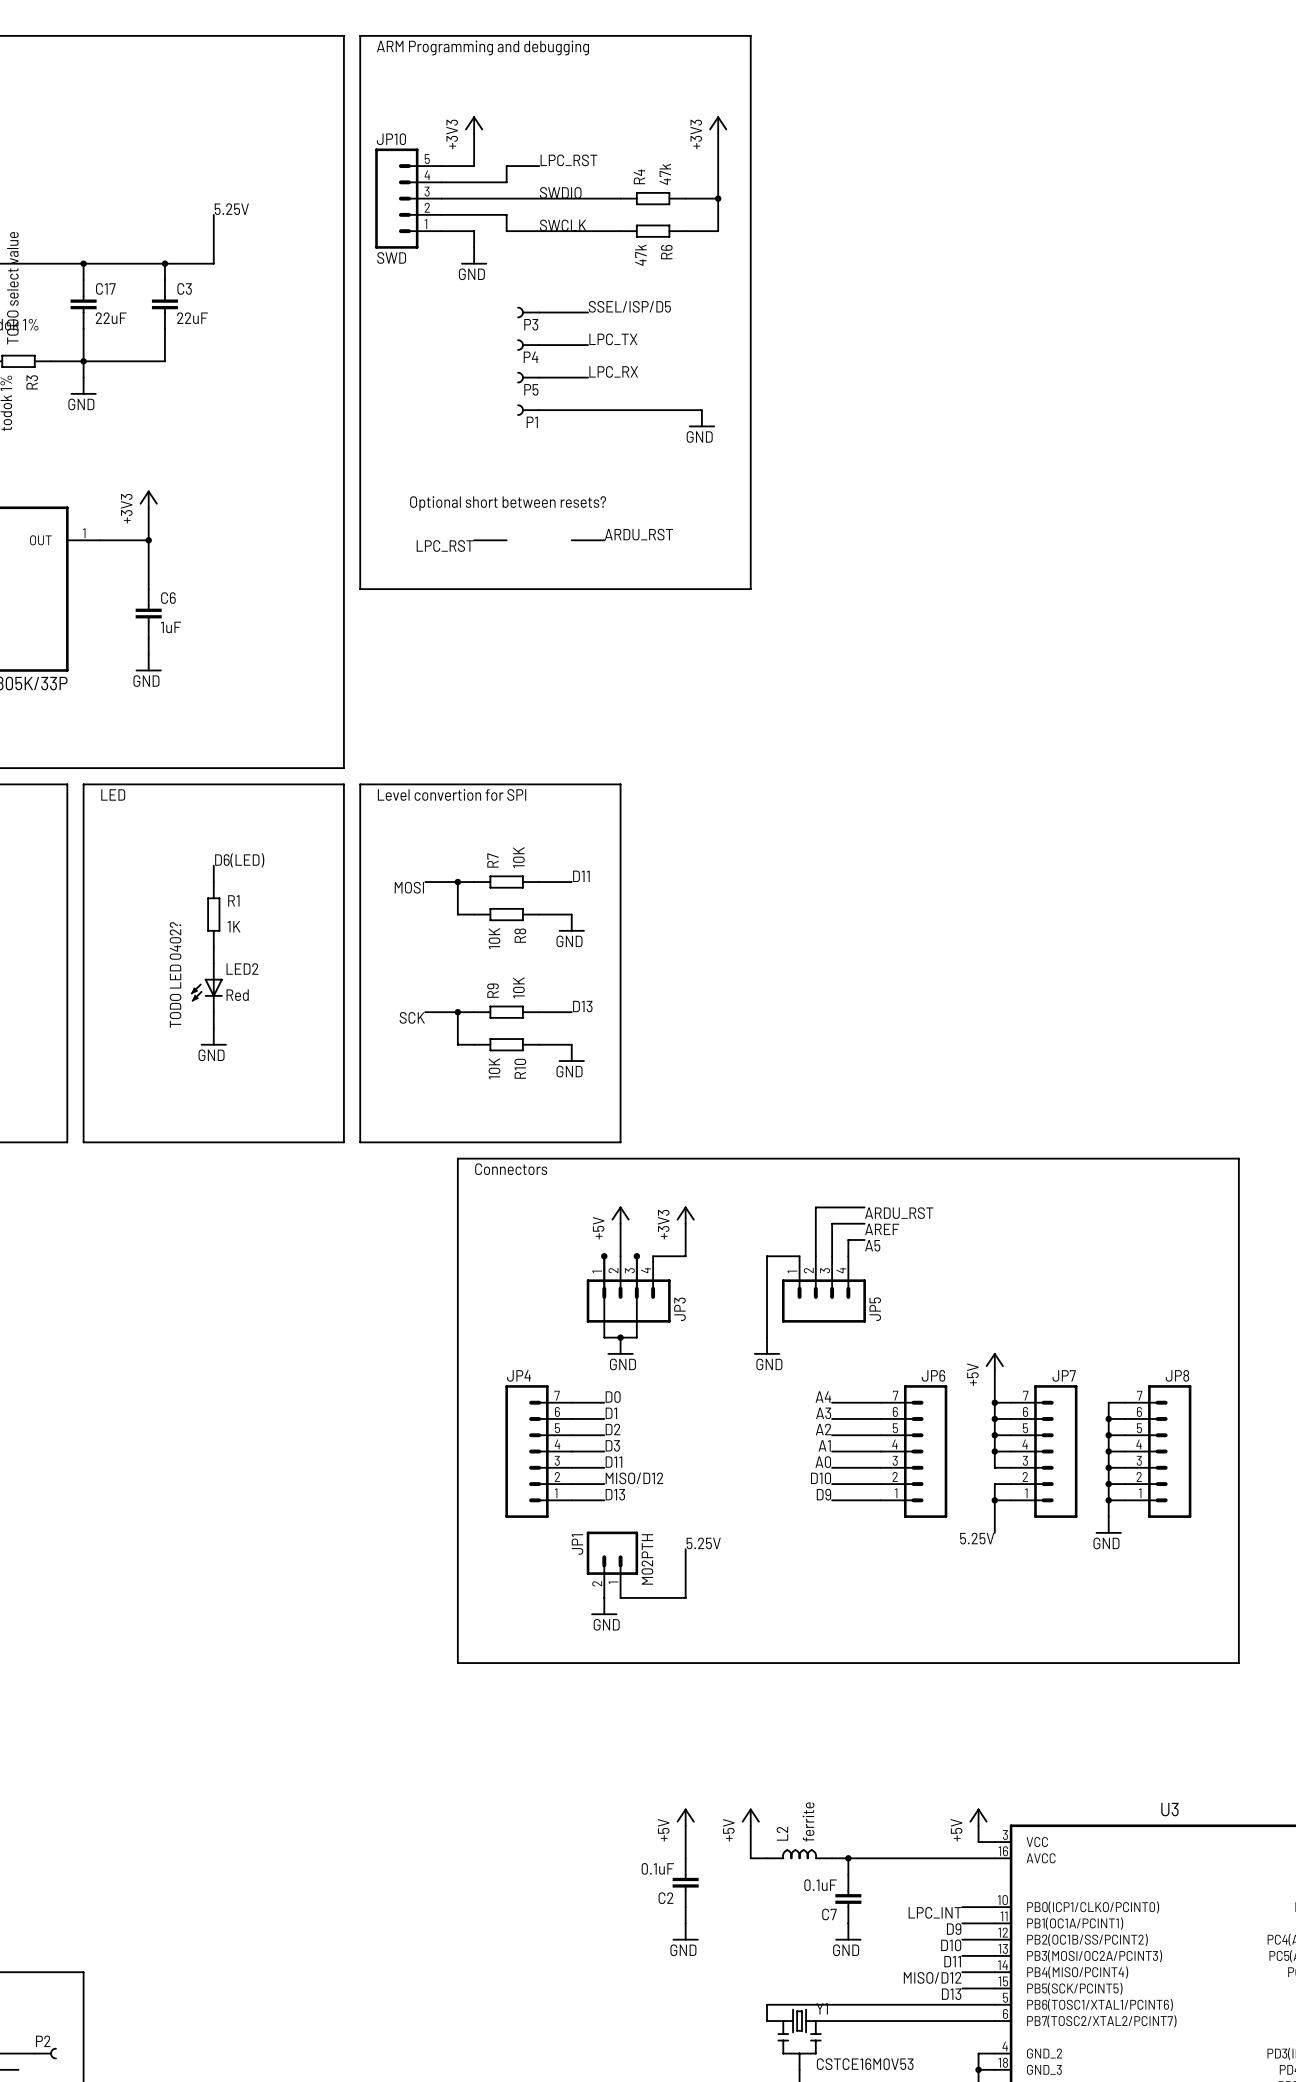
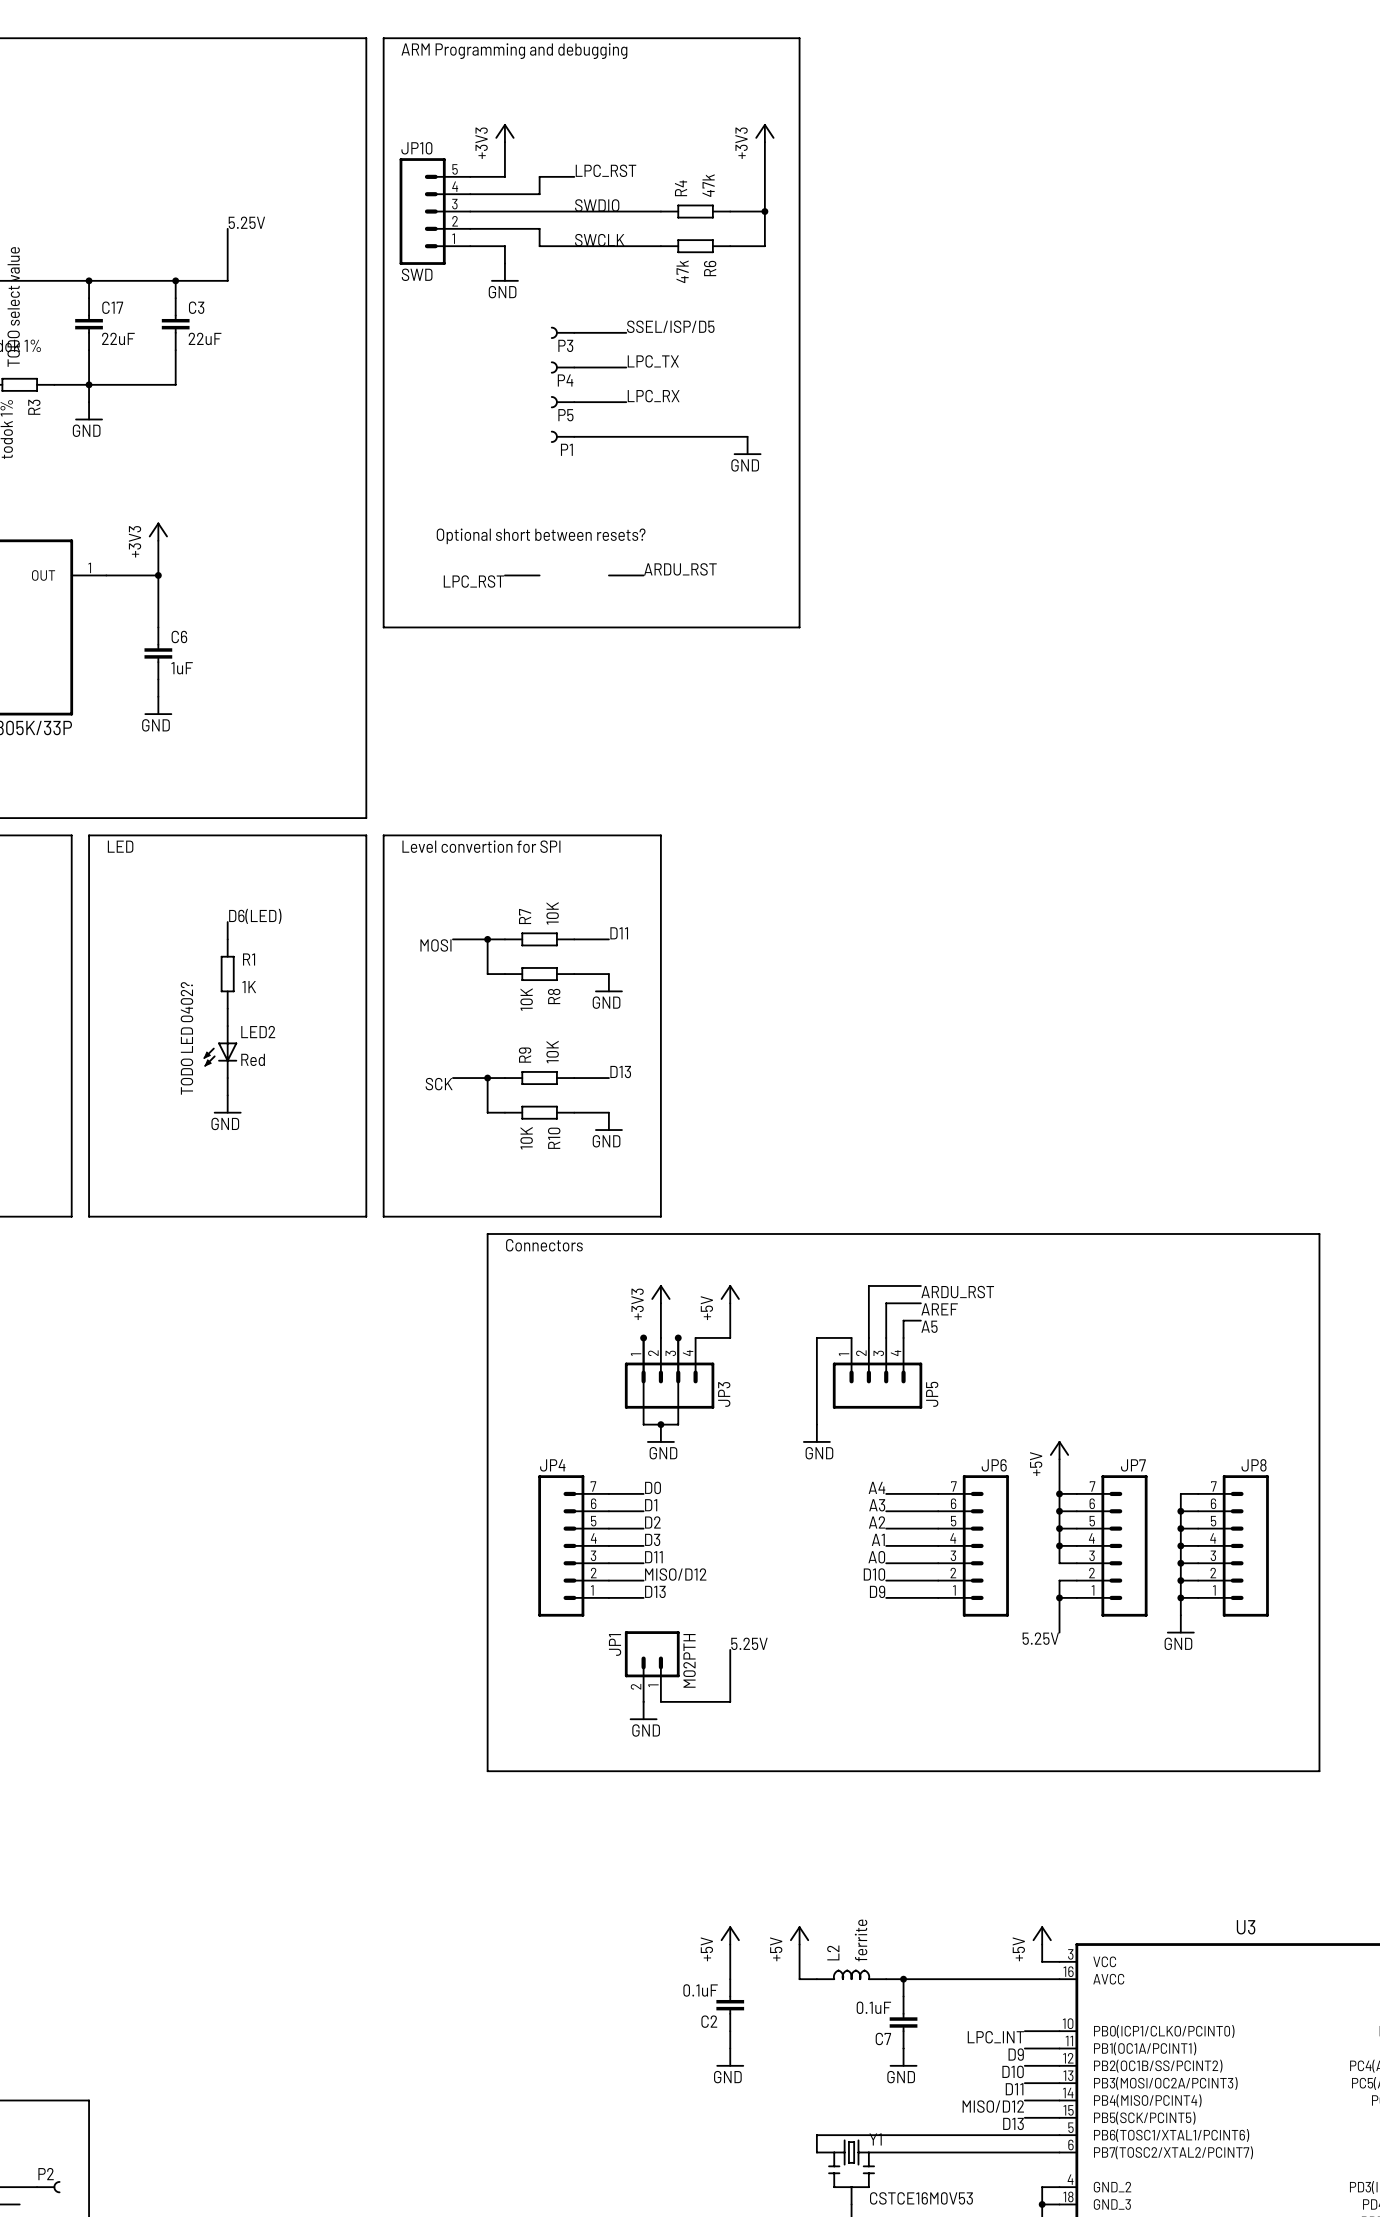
power symbol: +5V (620, 1215) -> +3V3 (660, 1294)
power symbol: +3V3 (685, 1215) -> +5V (730, 1294)

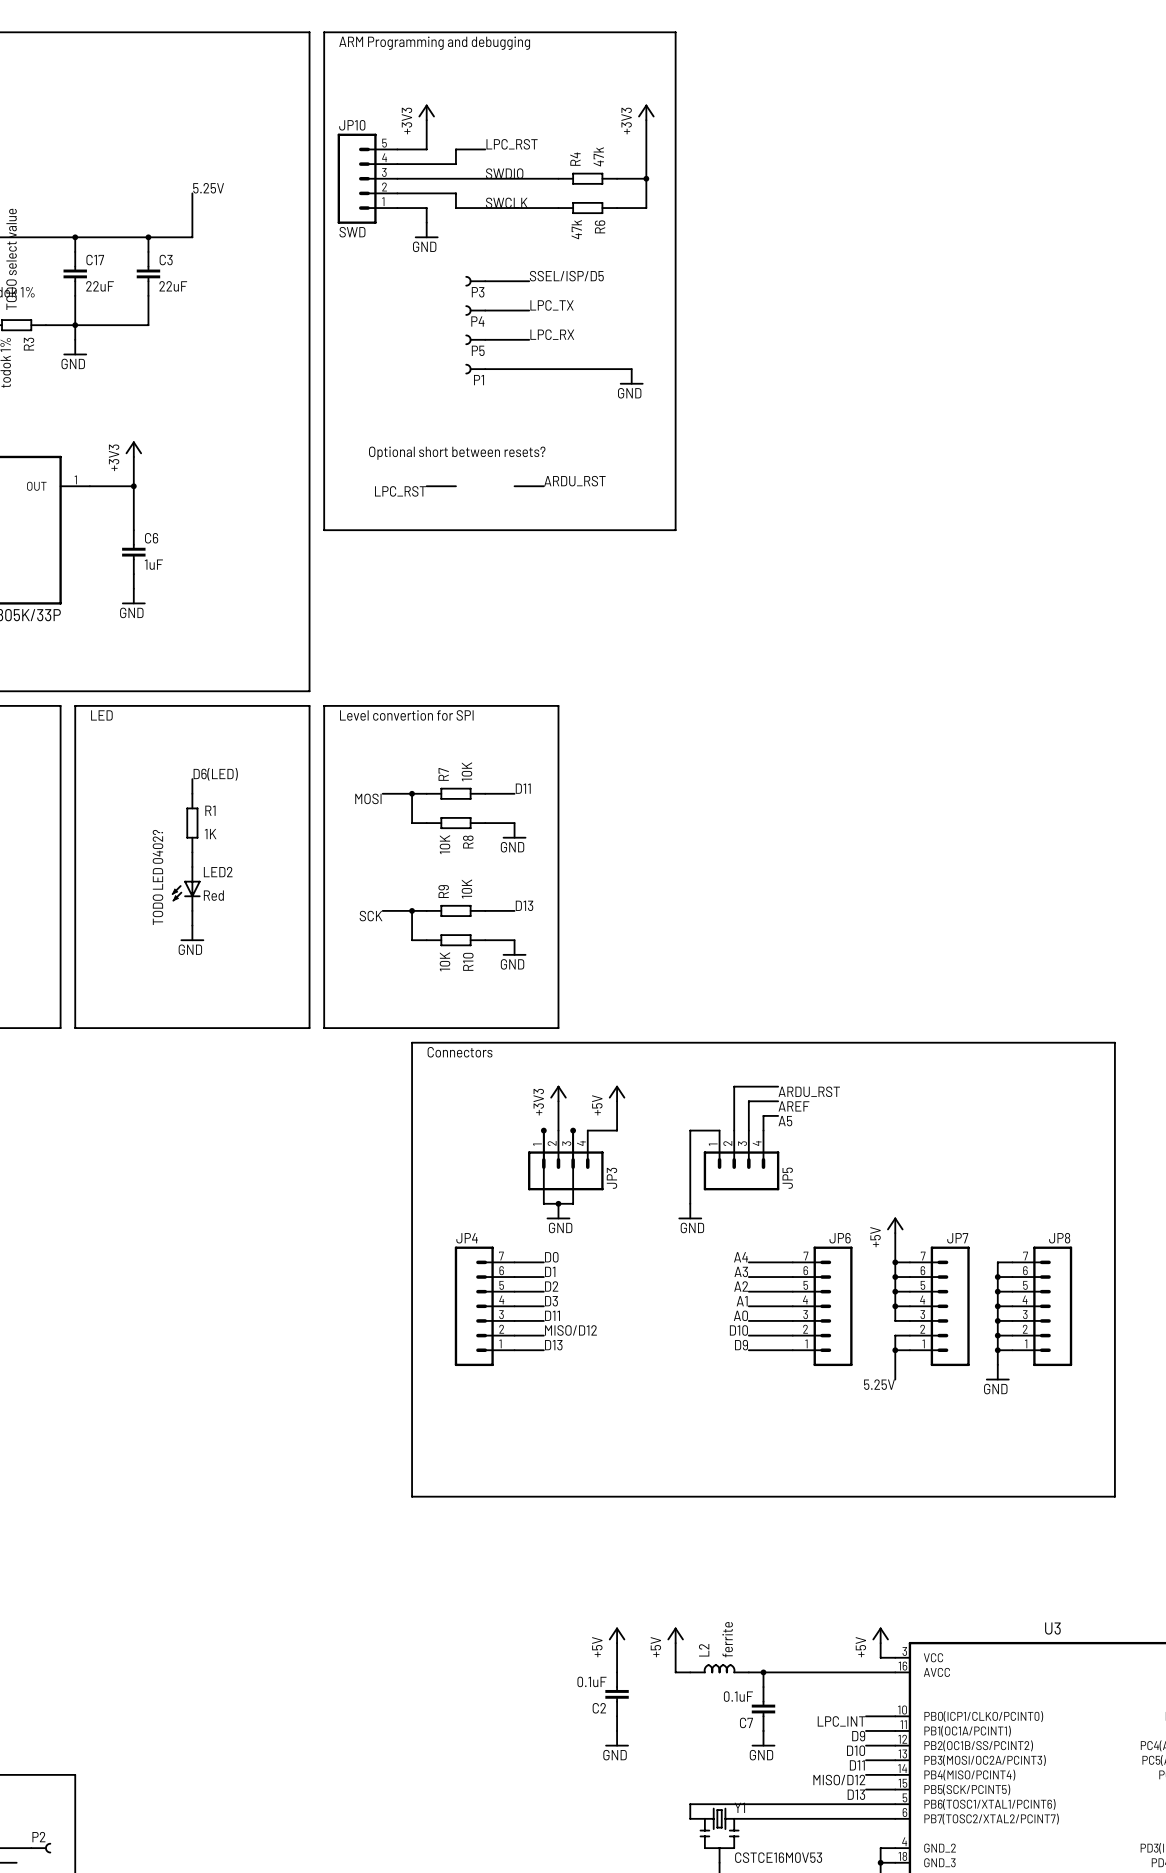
label: 5.25V (749, 1643) -> none
wire: (730, 1649) (730, 1701) (660, 1701) -> none
JP1: M02PTH (652, 1666) -> none
power symbol: GND (643, 1711) -> none

